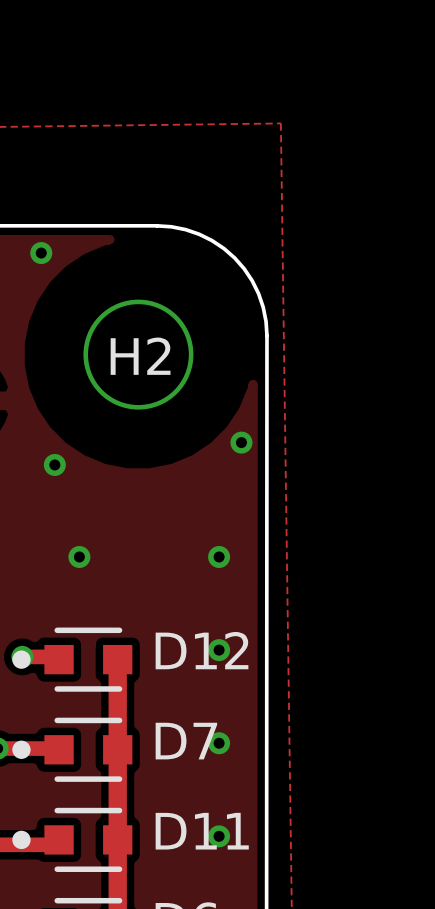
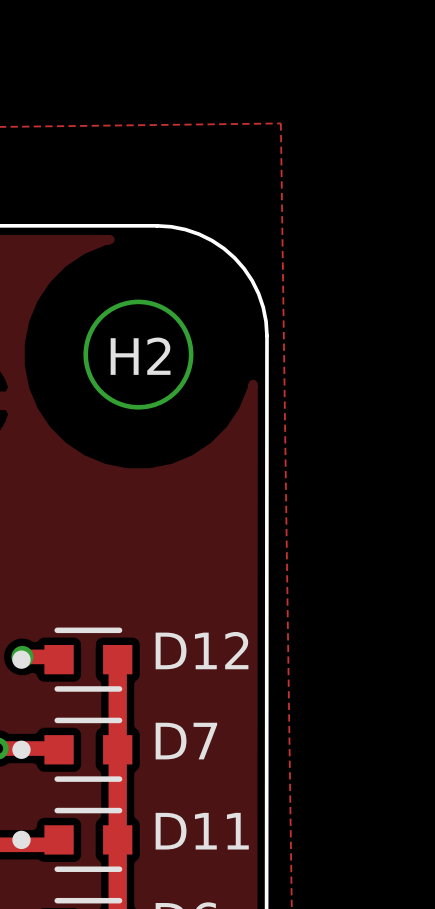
via: (41, 253) -> none
via: (241, 442) -> none
via: (54, 464) -> none
via: (79, 556) -> none
via: (219, 556) -> none
via: (219, 650) -> none
via: (219, 743) -> none
via: (219, 836) -> none

